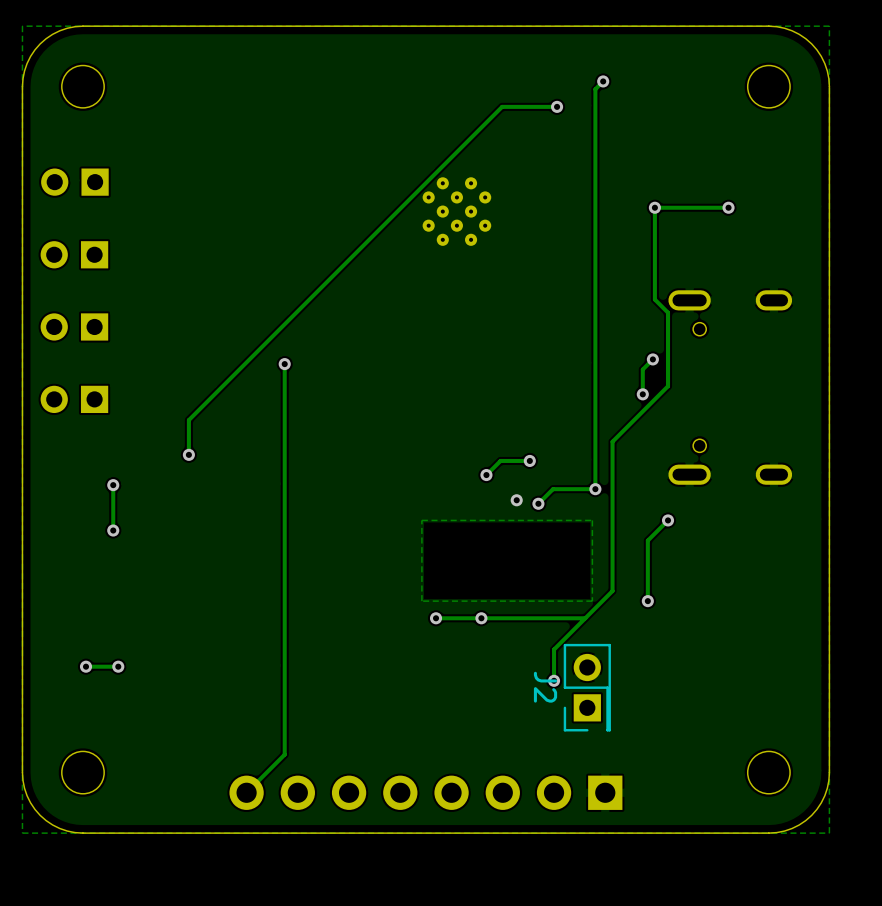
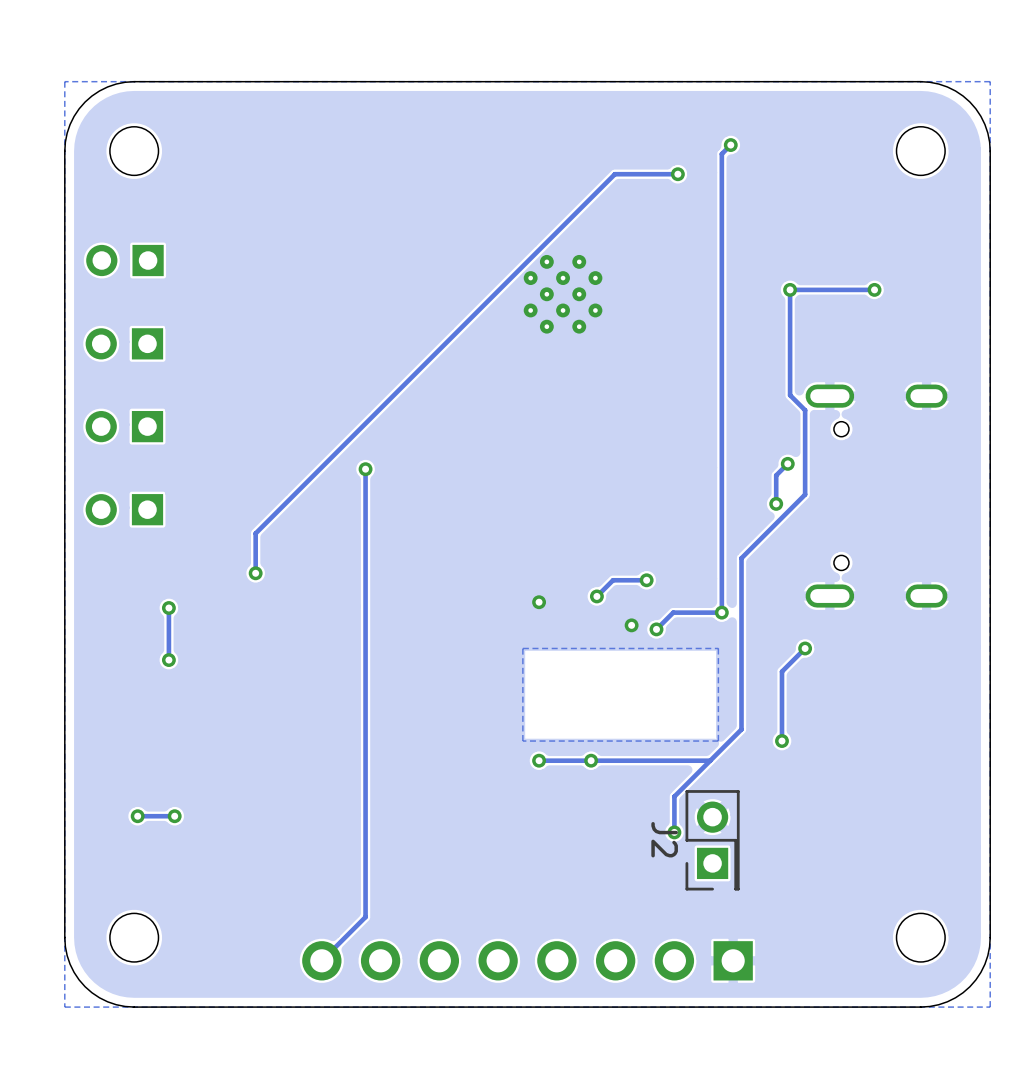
via: none -> (539, 602)

